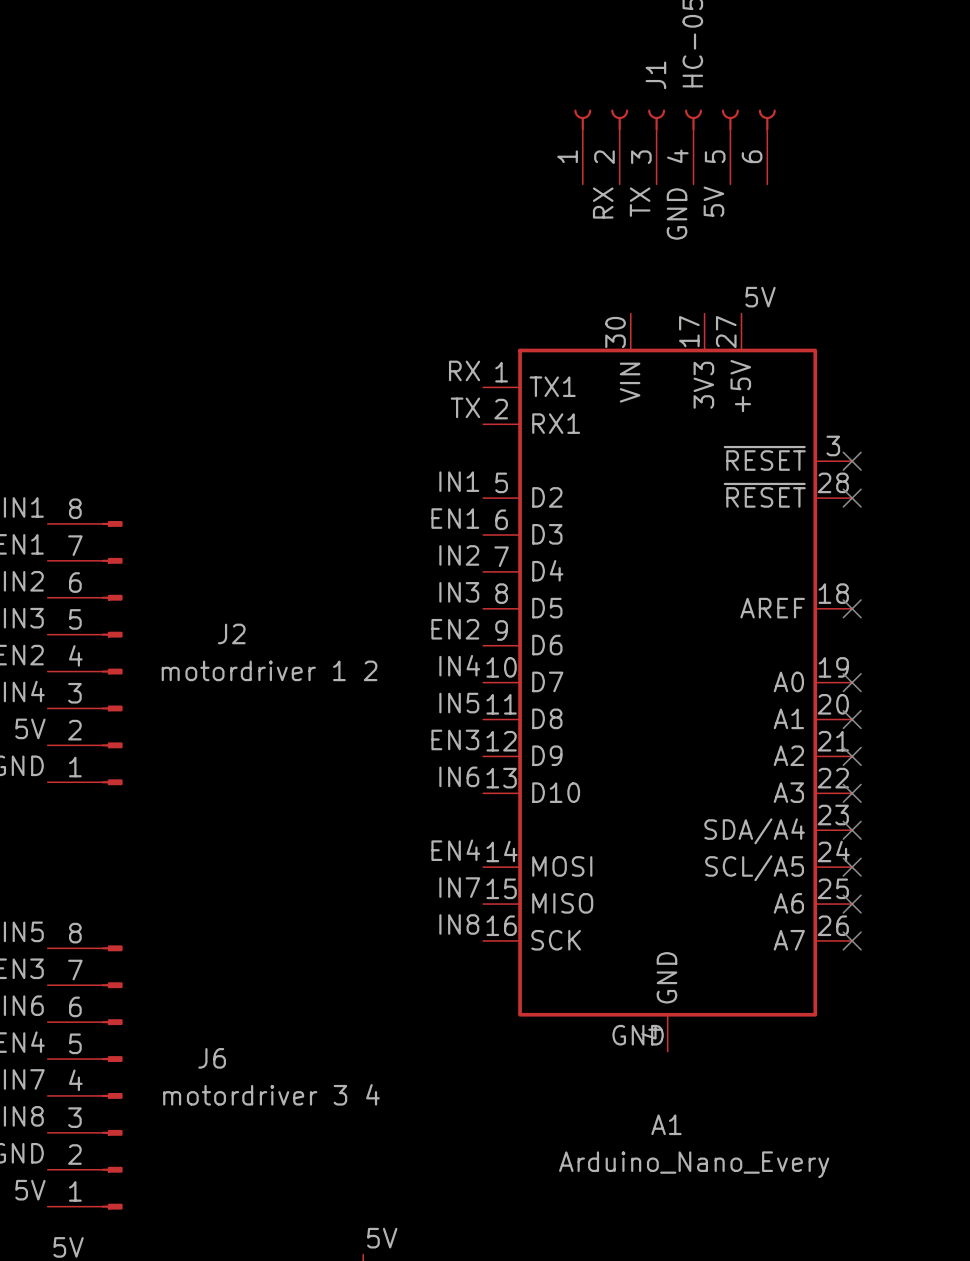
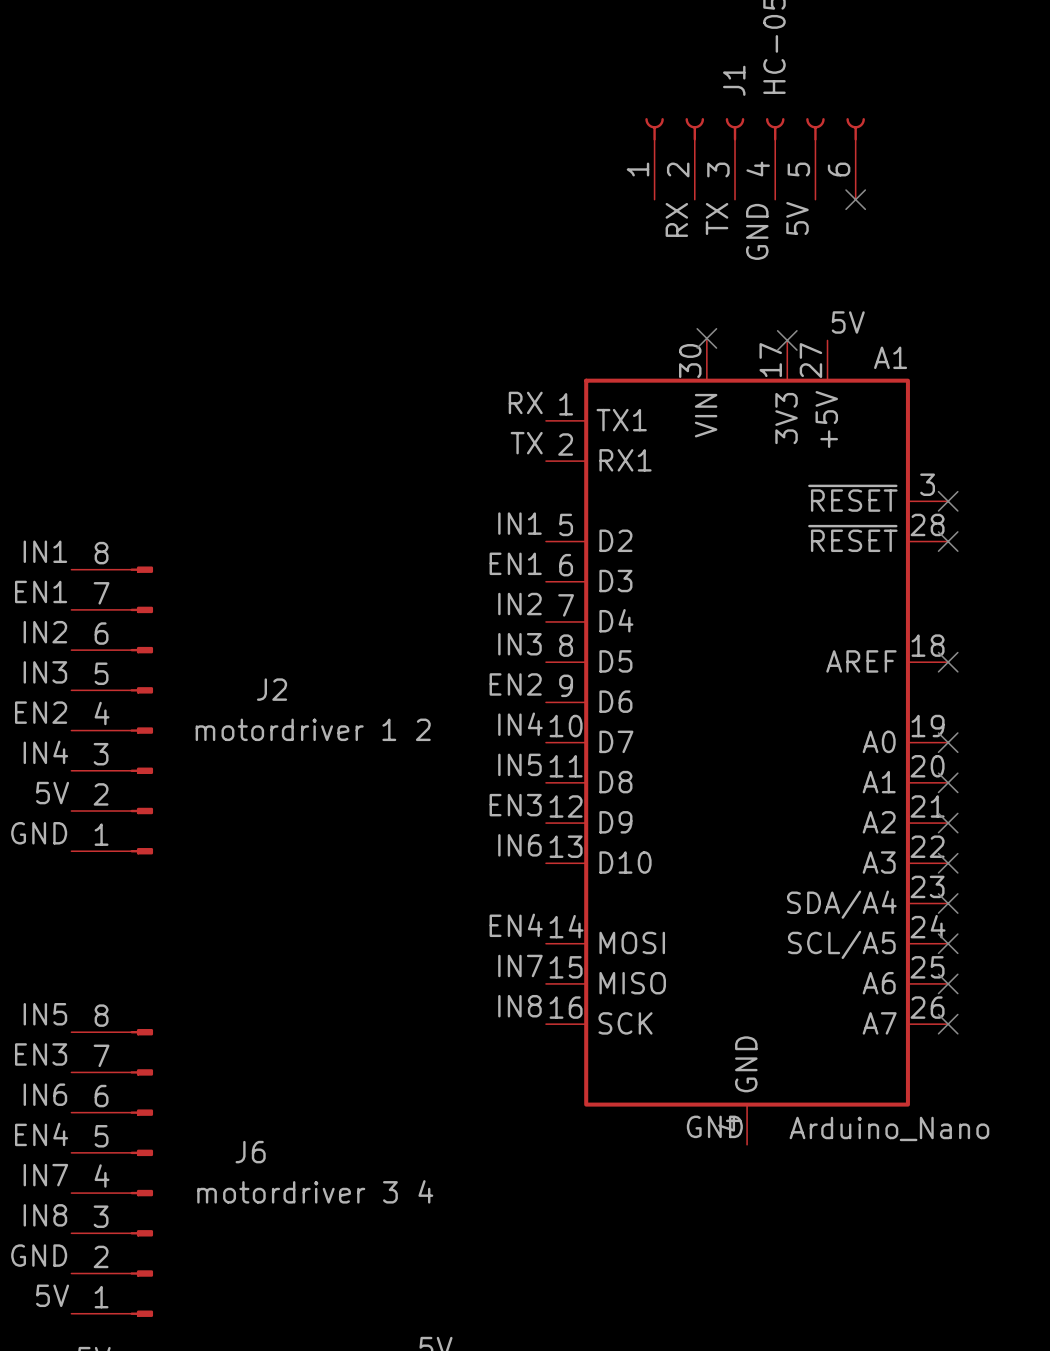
no-connect mark: none -> (855, 199)
no-connect mark: none -> (706, 338)
no-connect mark: none -> (787, 340)
A1 name position: A1 (666, 1124) -> A1 (890, 357)
A1 value: Arduino_Nano_Every (694, 1164) -> Arduino_Nano (889, 1128)

